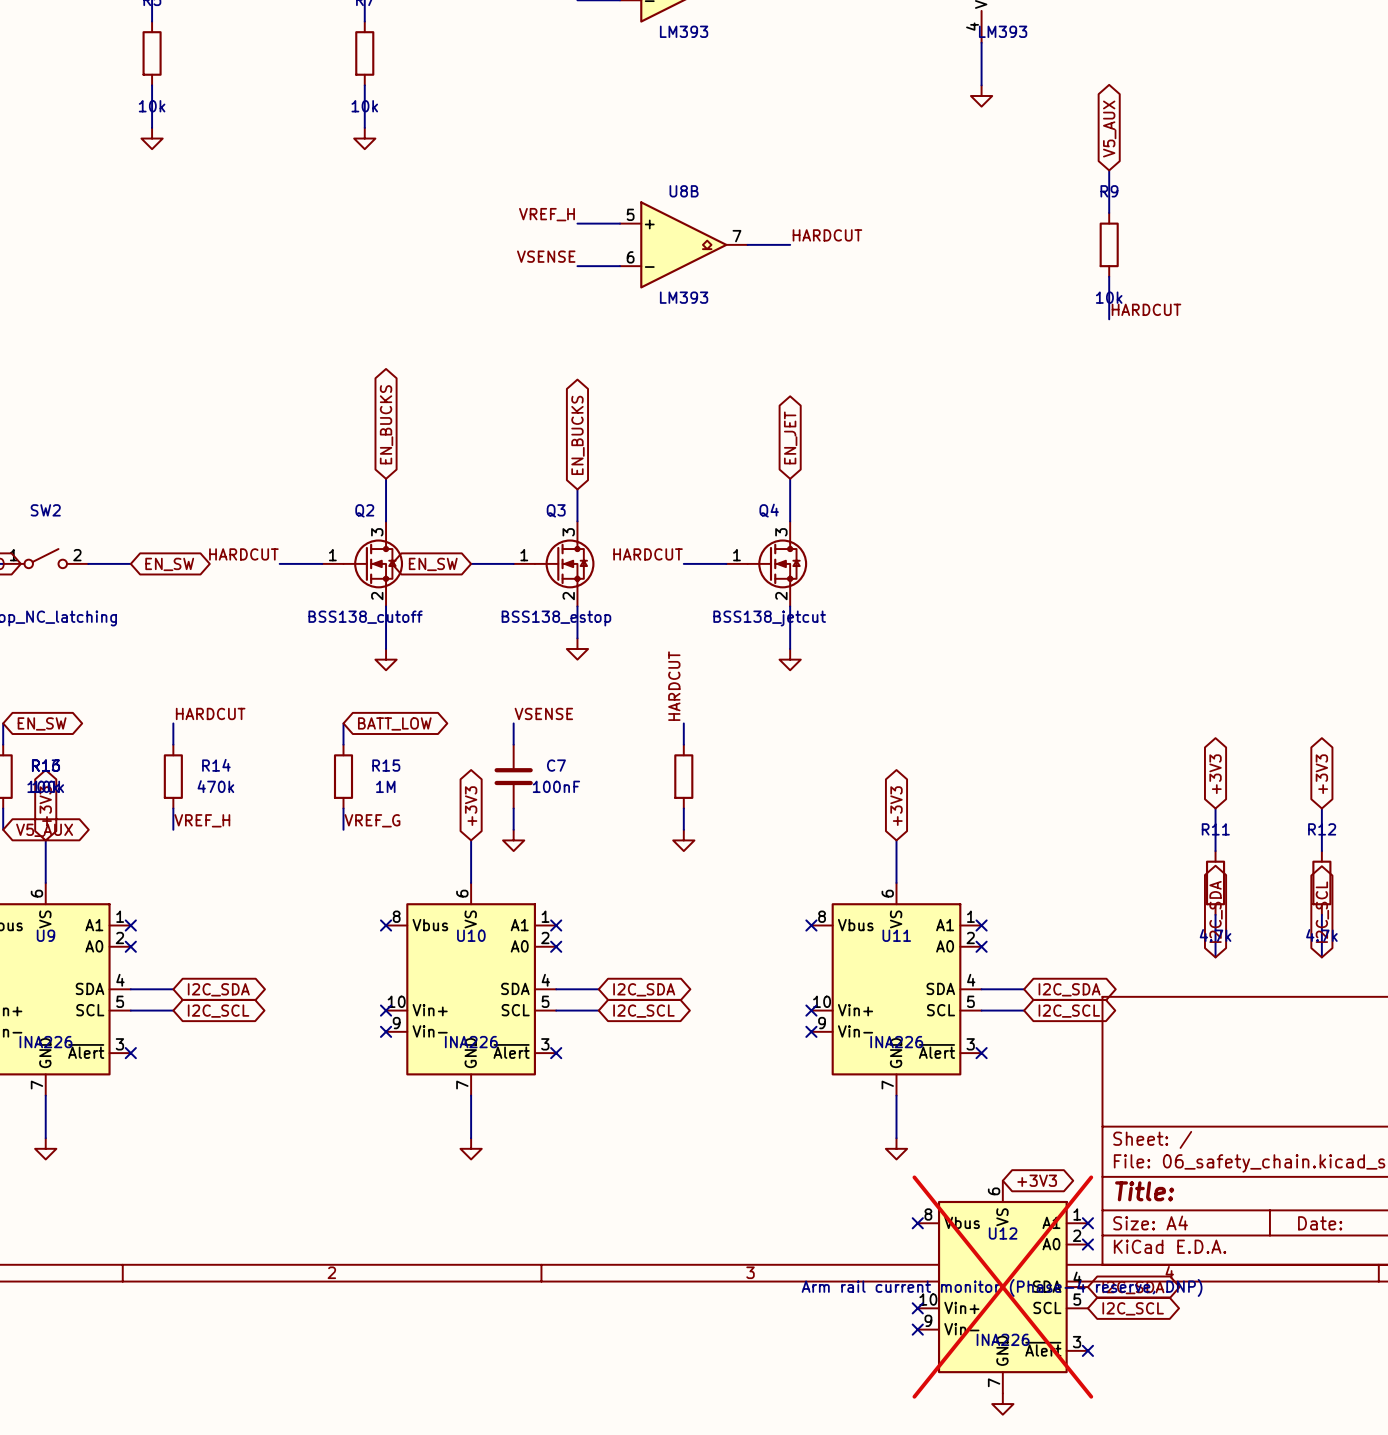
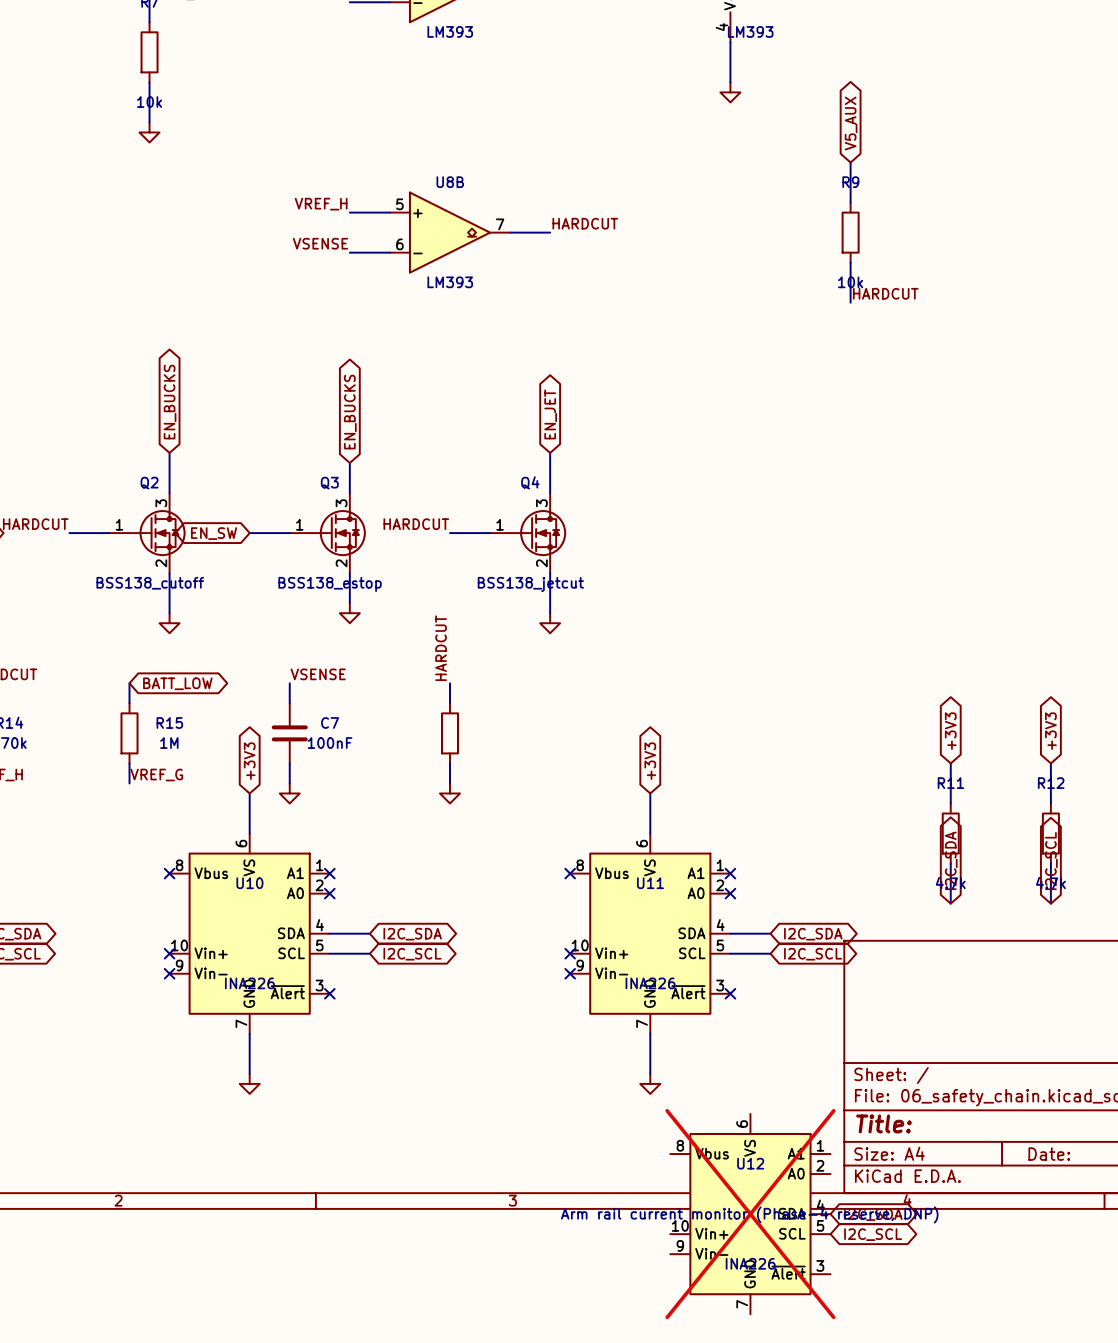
global label: +3V3 (1037, 1180) -> none
no-connect mark: (917, 1223) -> none
no-connect mark: (1087, 1223) -> none
no-connect mark: (1087, 1244) -> none
no-connect mark: (917, 1308) -> none
no-connect mark: (917, 1329) -> none
no-connect mark: (1087, 1350) -> none
power symbol: (1002, 1404) -> none

